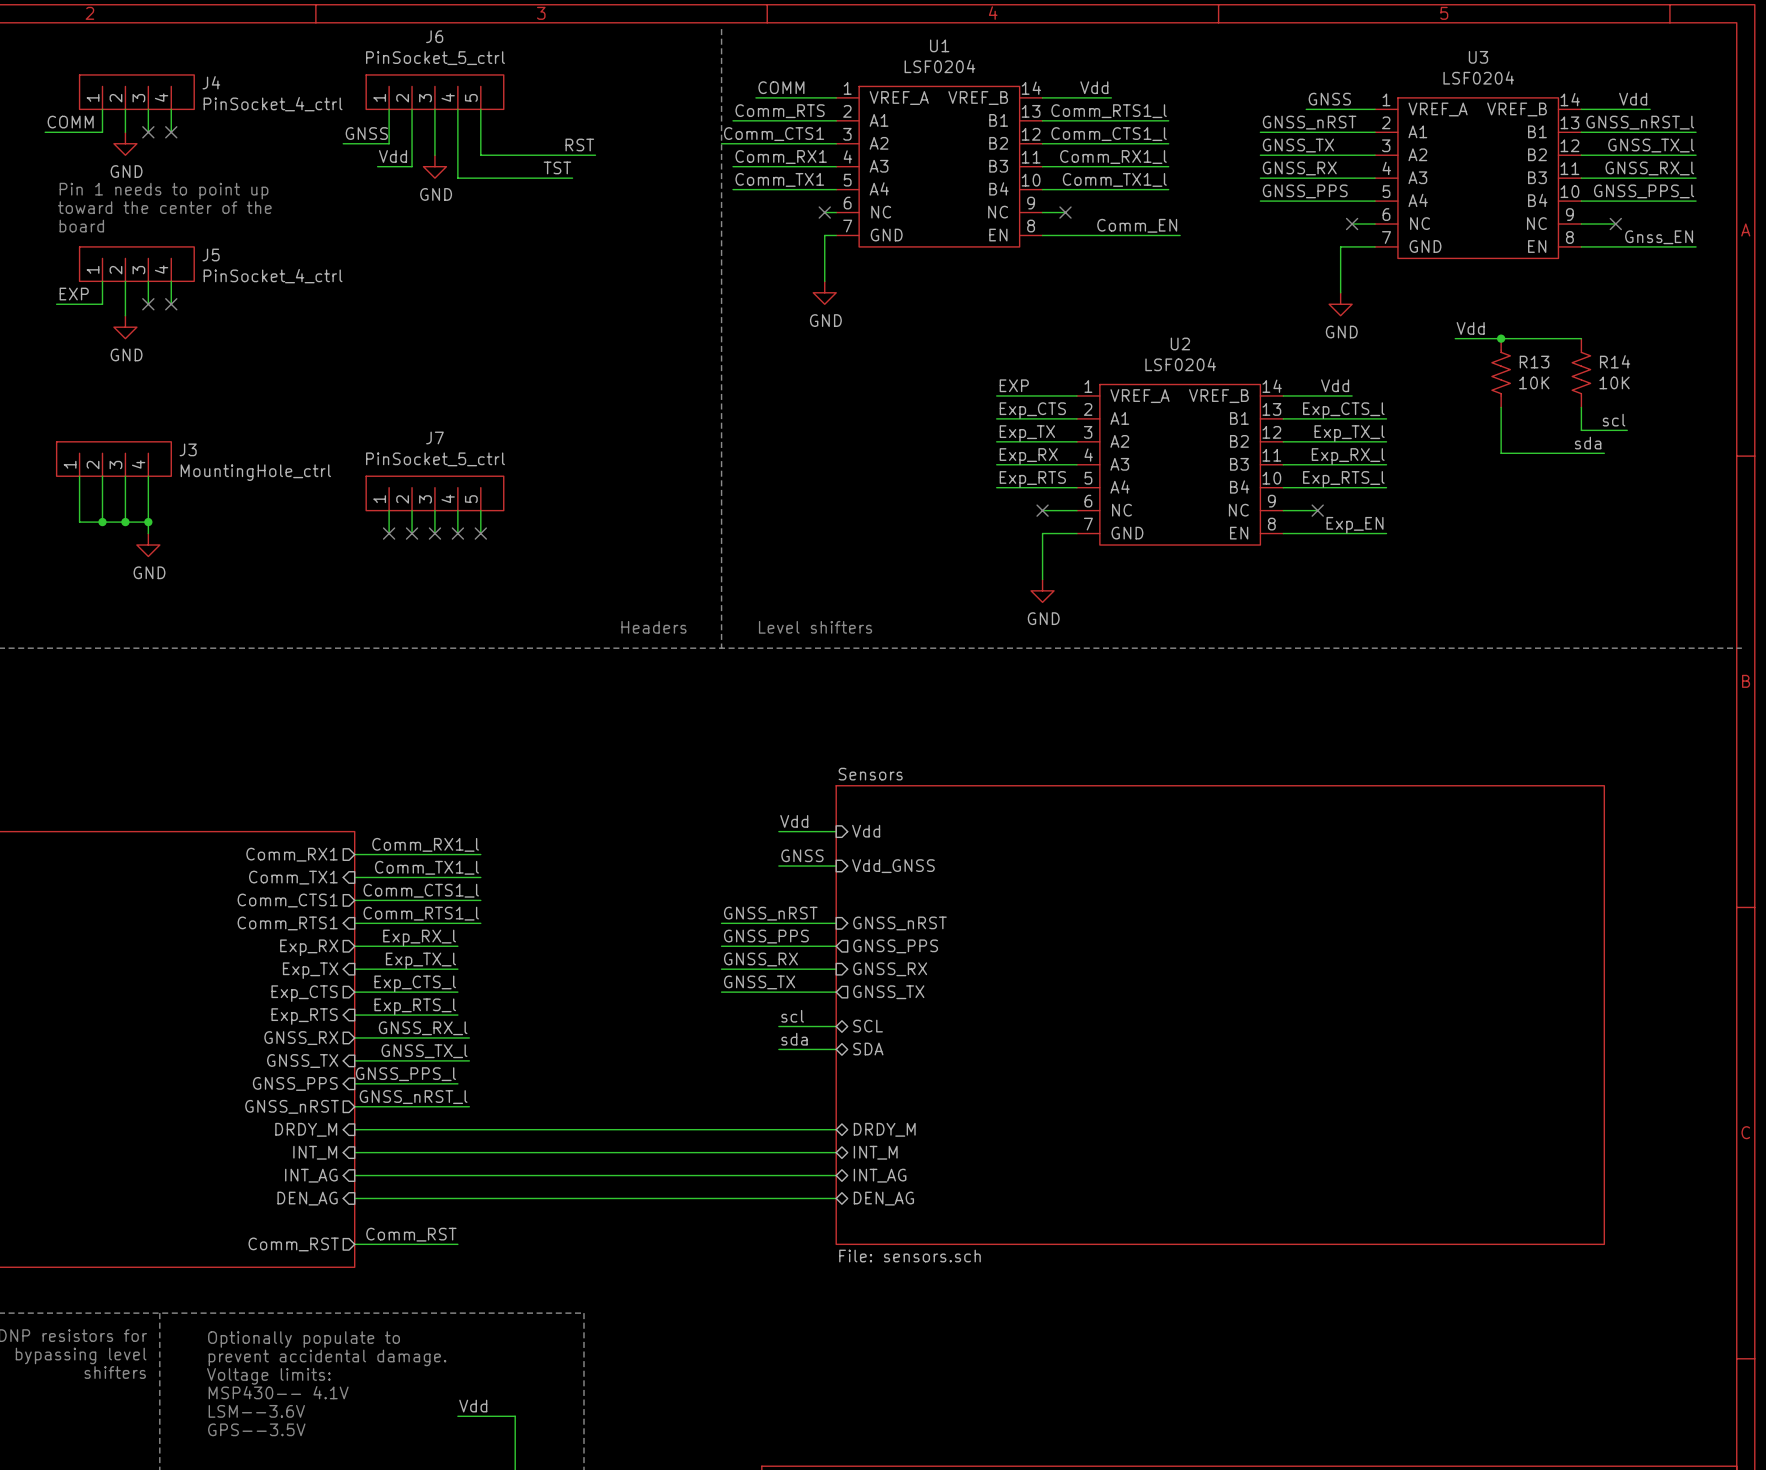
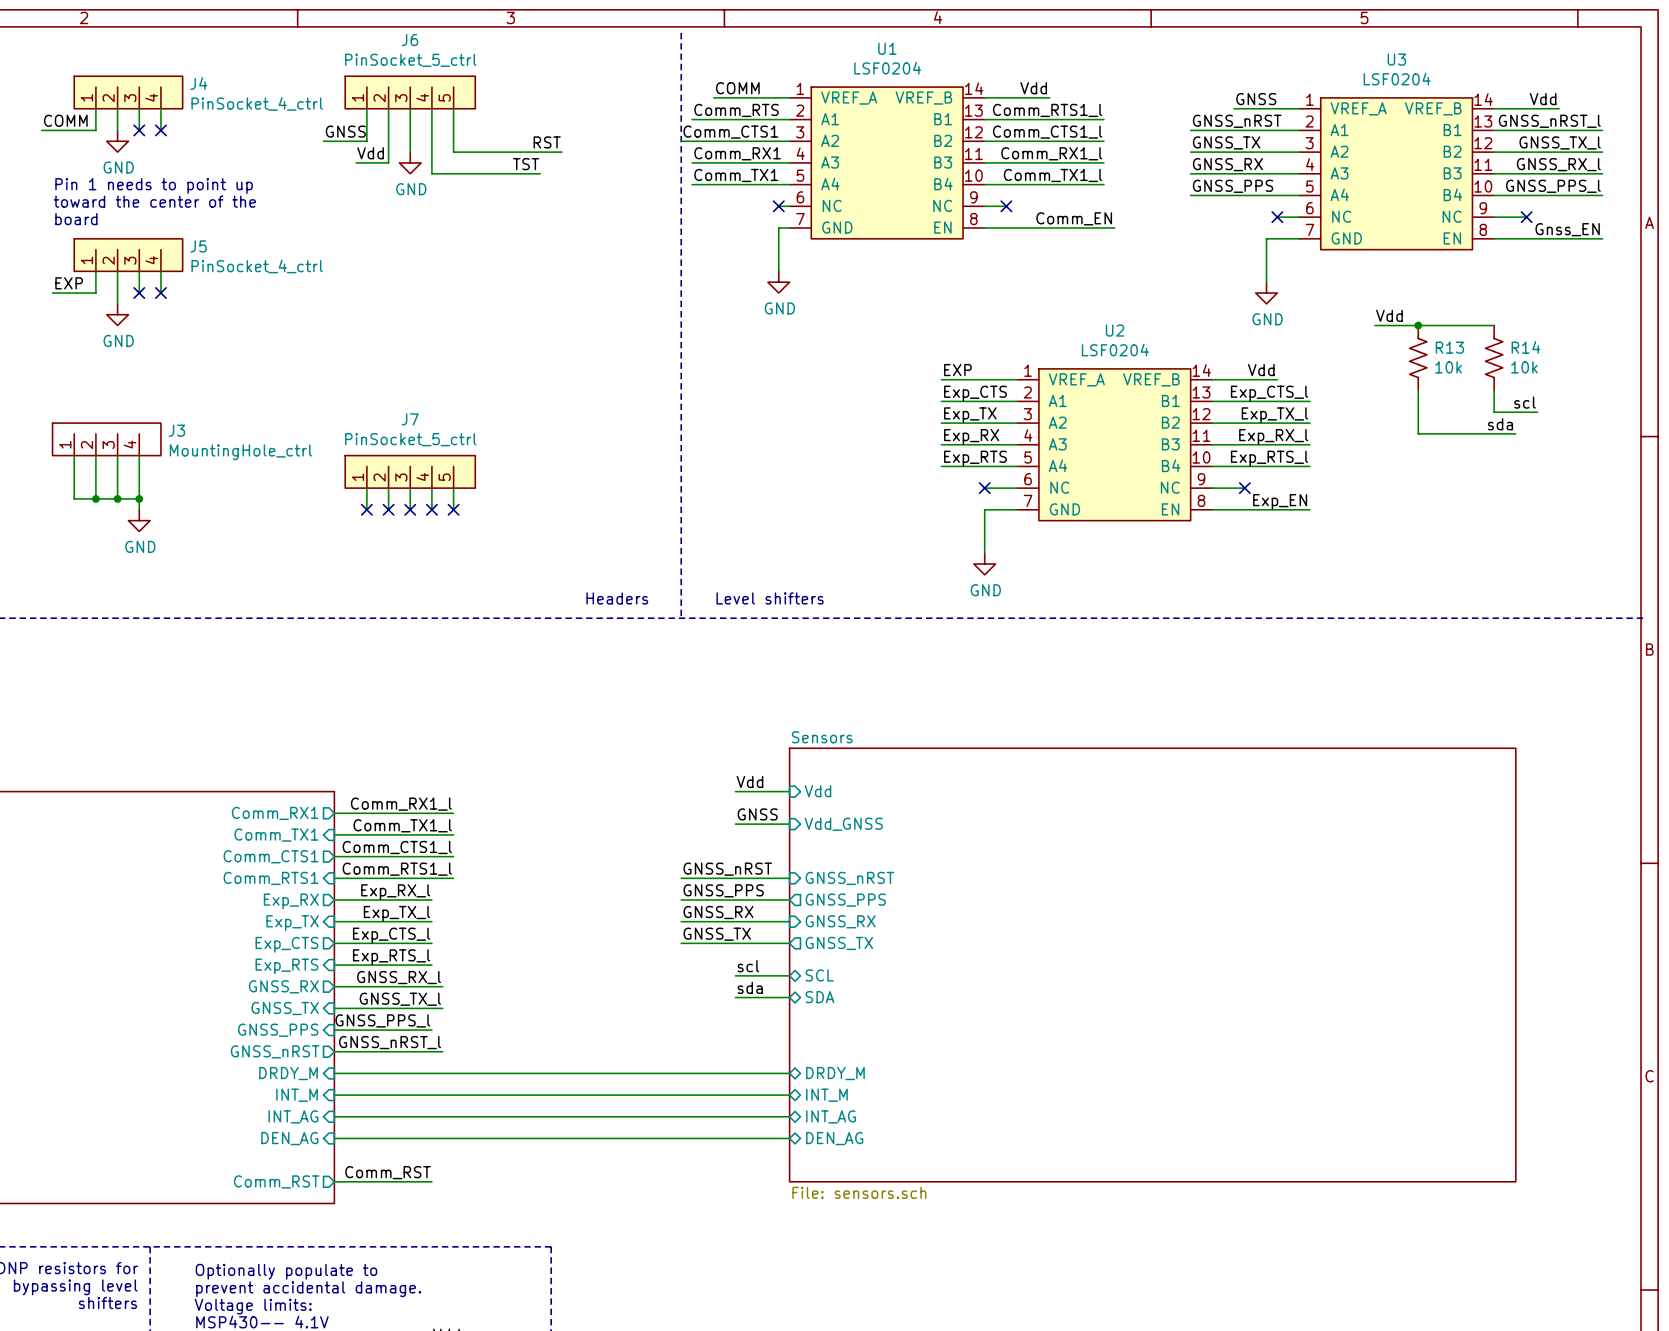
R13 value: 10K (1534, 382) -> 10k (1448, 367)
R14 value: 10K (1614, 382) -> 10k (1524, 367)

